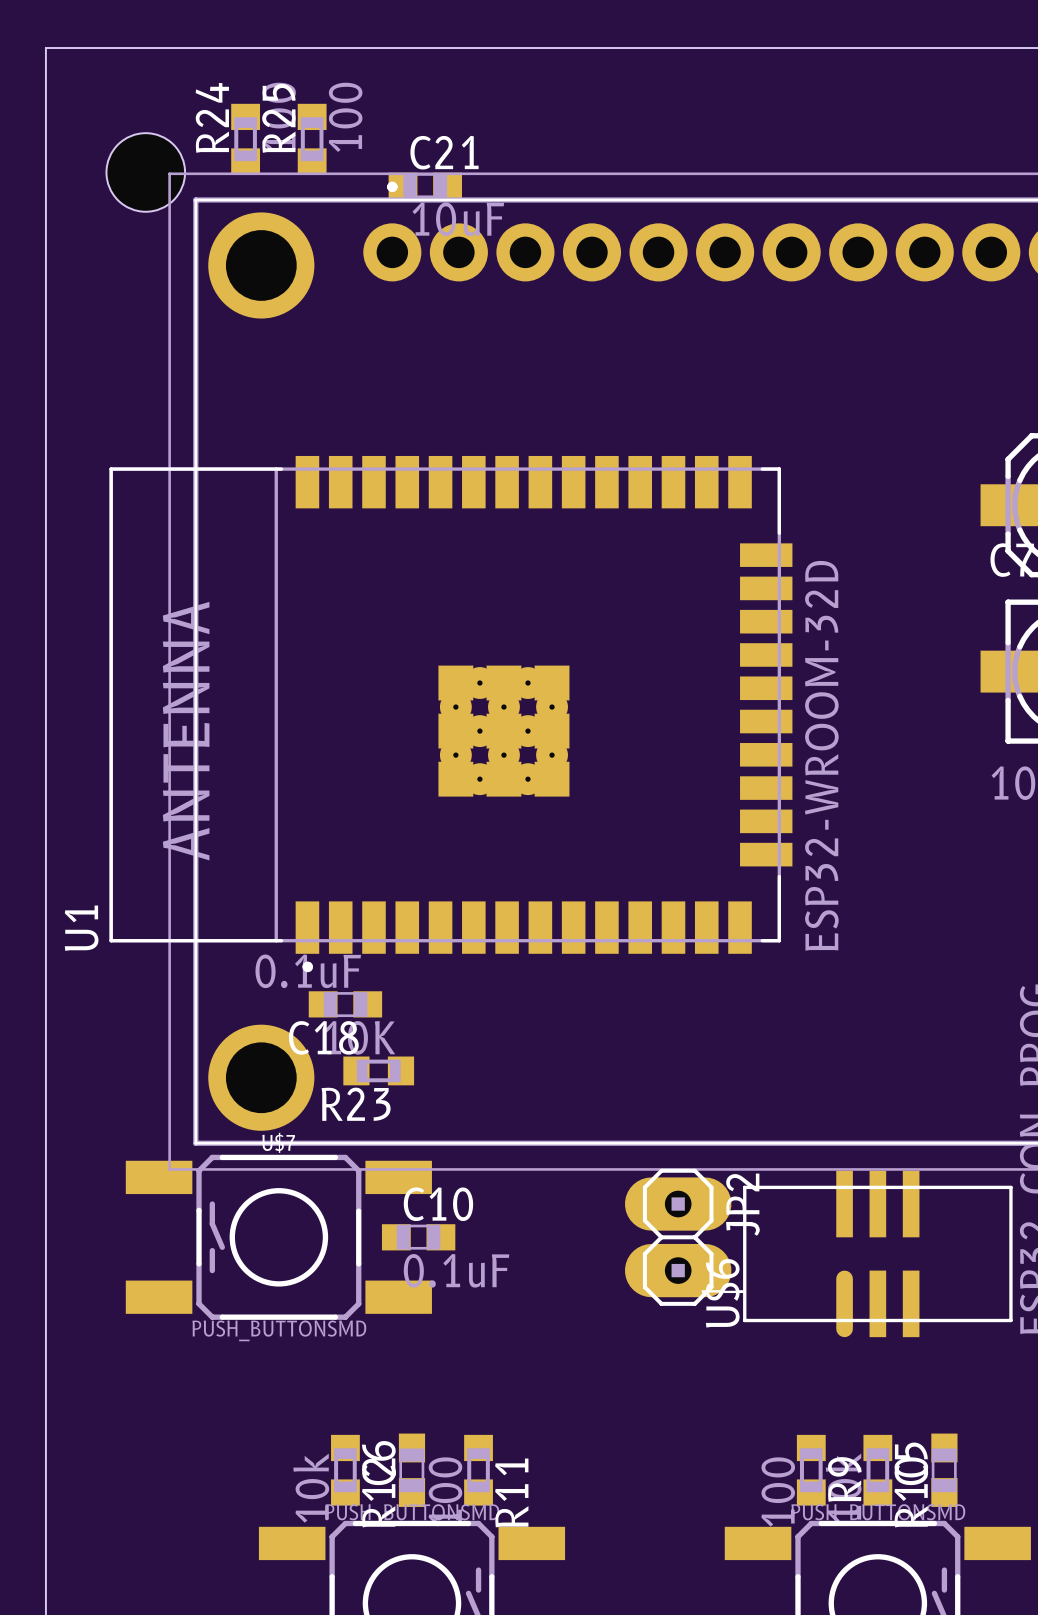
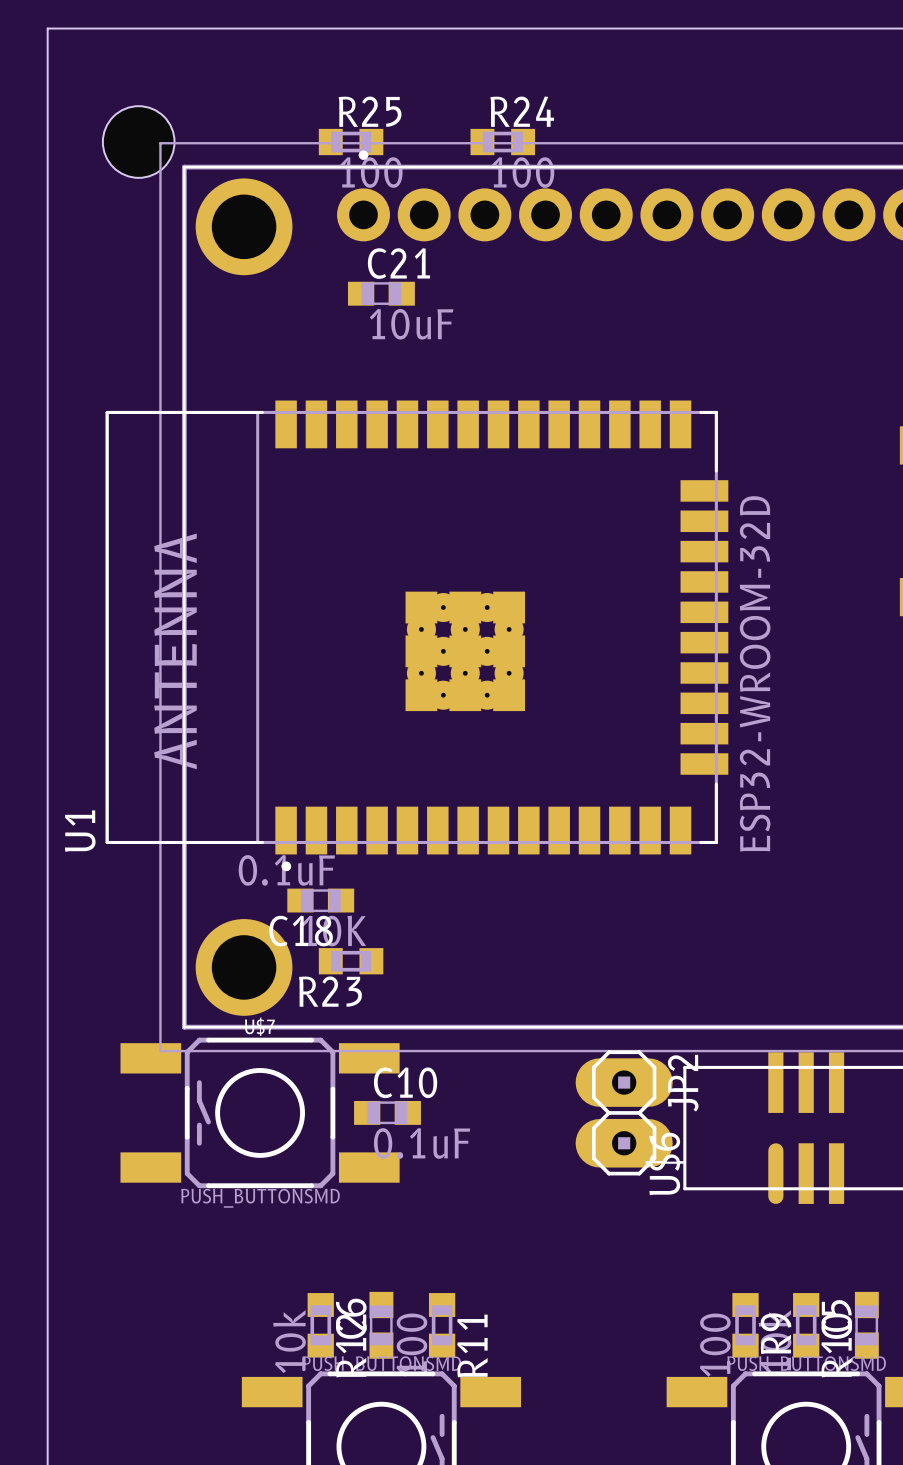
R24 rotation: 0° (245, 139) -> 90° clockwise (502, 142)
R24 position: (245, 139) -> (502, 142)
R25 rotation: 0° (312, 139) -> 90° clockwise (351, 142)
R25 position: (312, 139) -> (351, 142)
C21 position: (425, 185) -> (381, 293)

